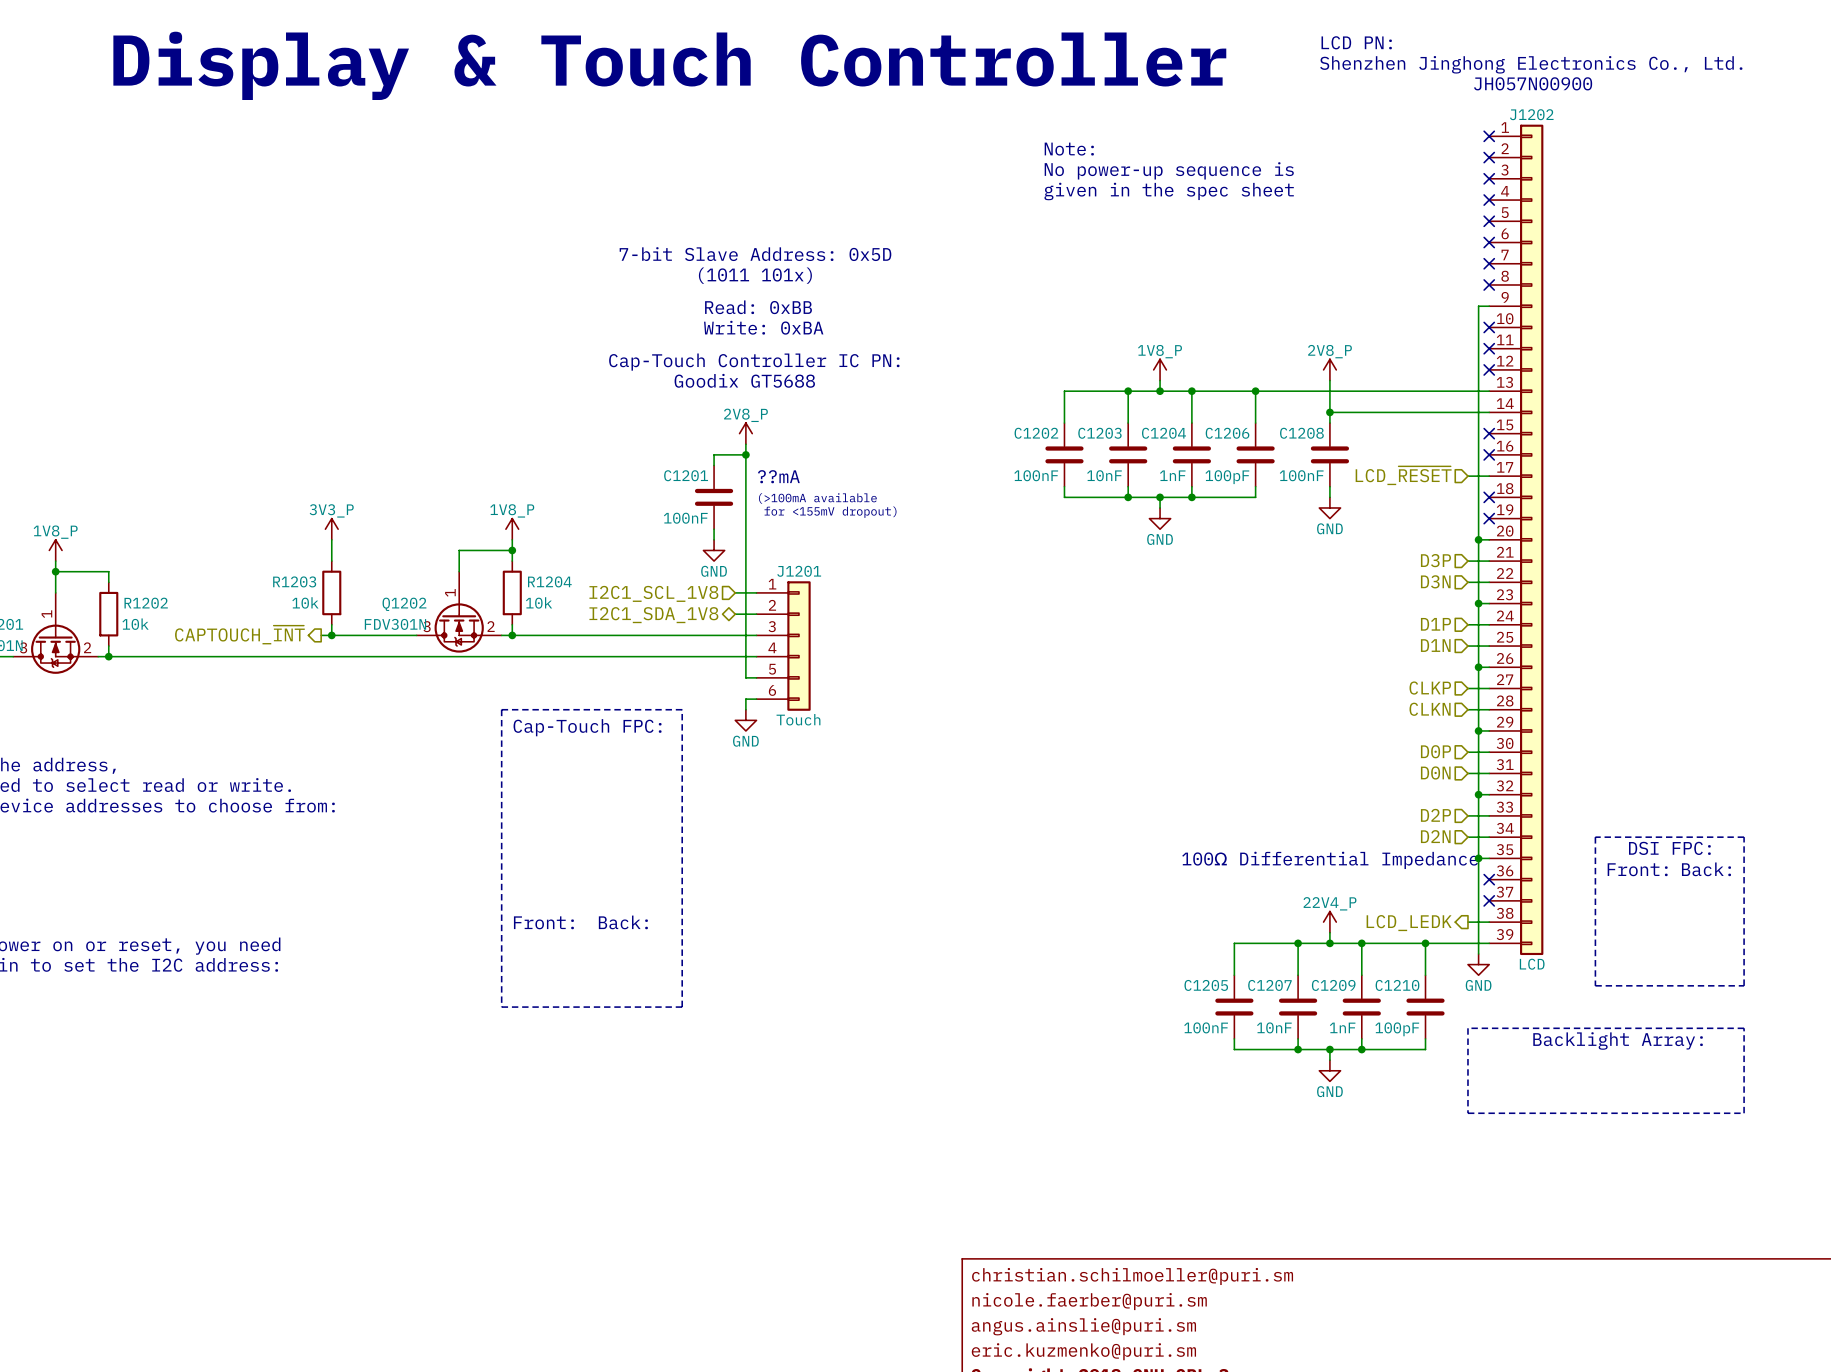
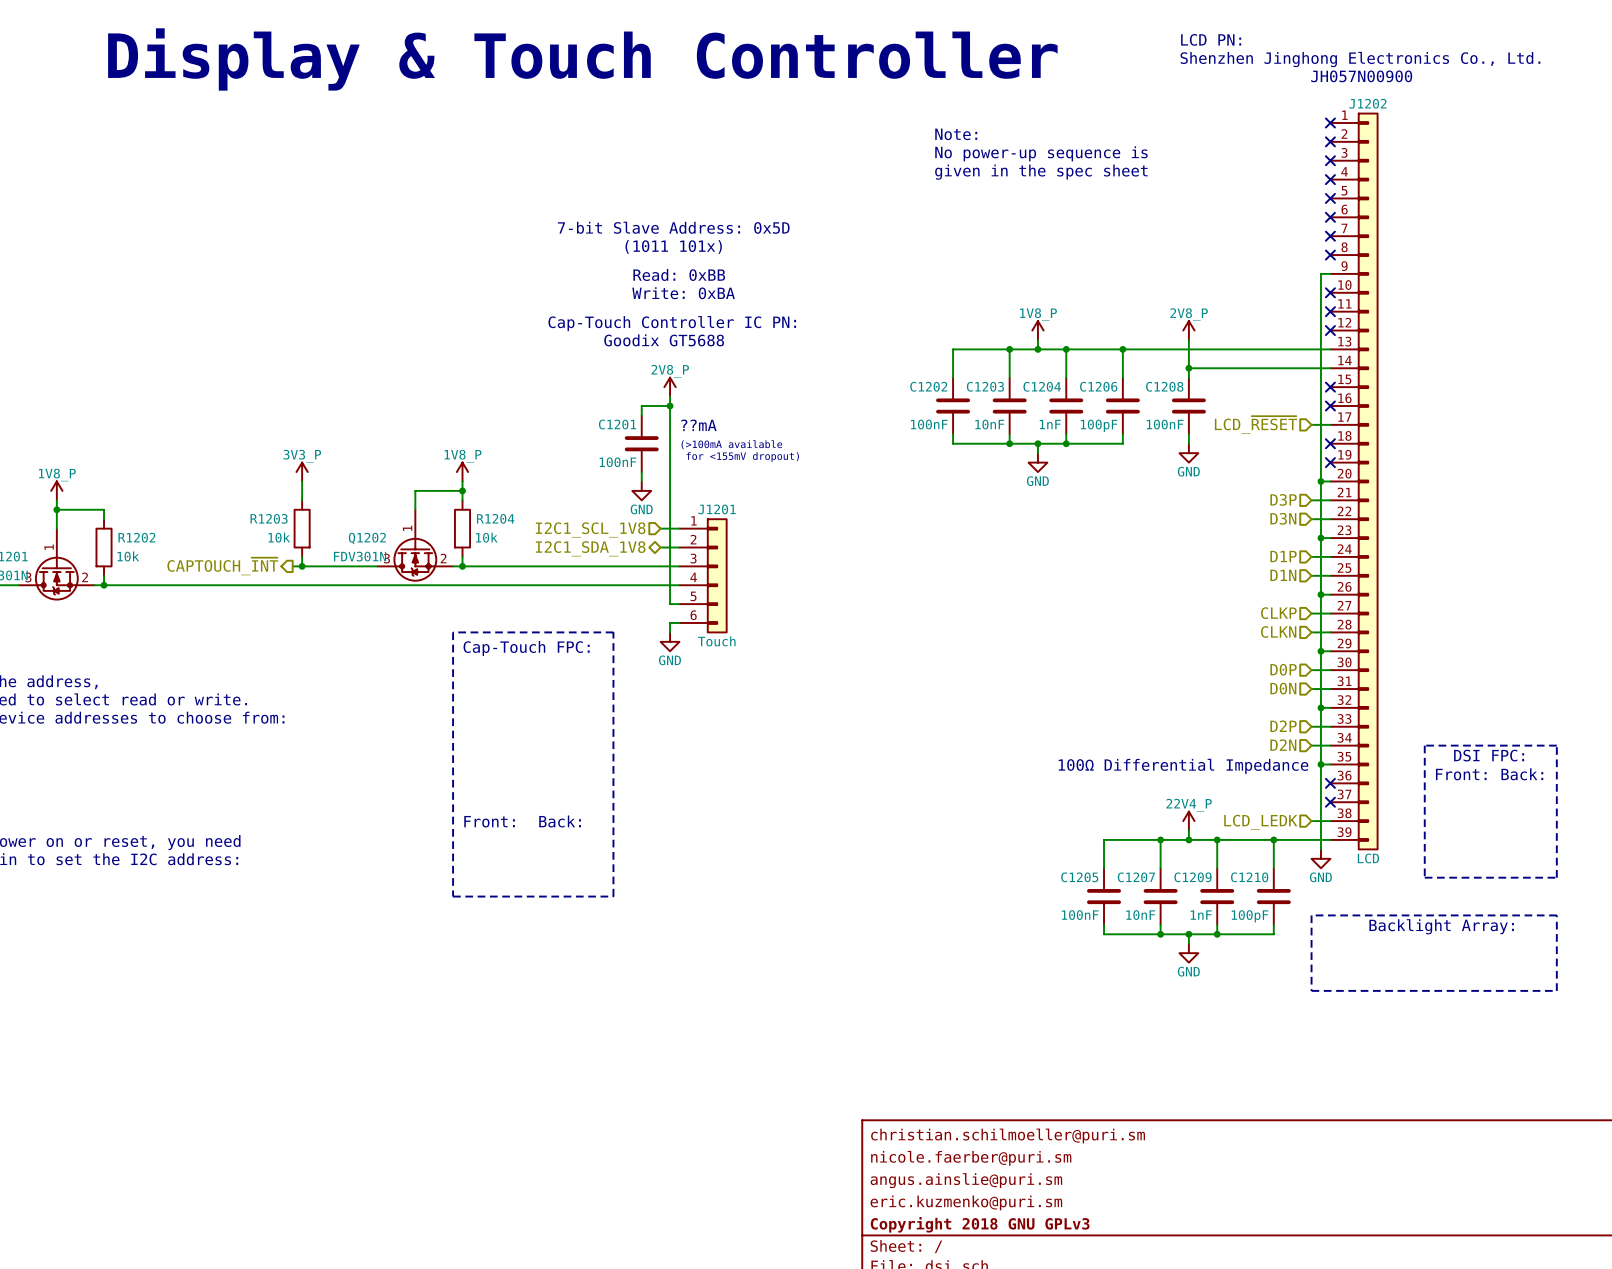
hierarchical label shape: output (1409, 923) -> input (1260, 822)

